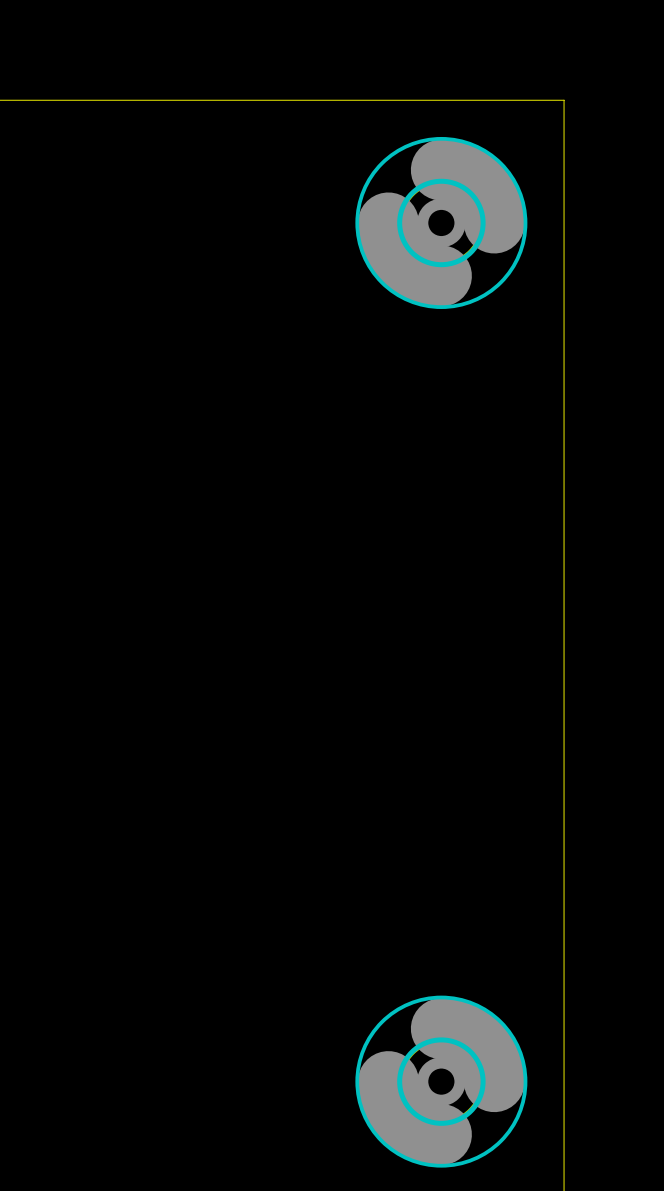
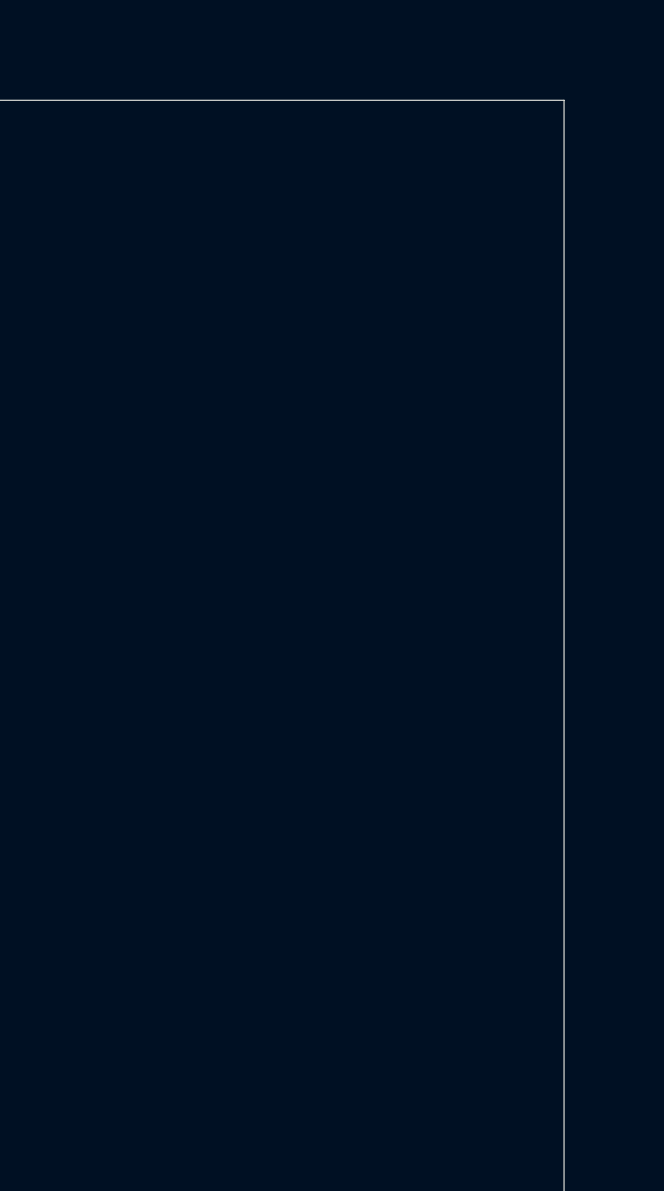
part: (441, 222) -> none
part: (441, 1081) -> none

